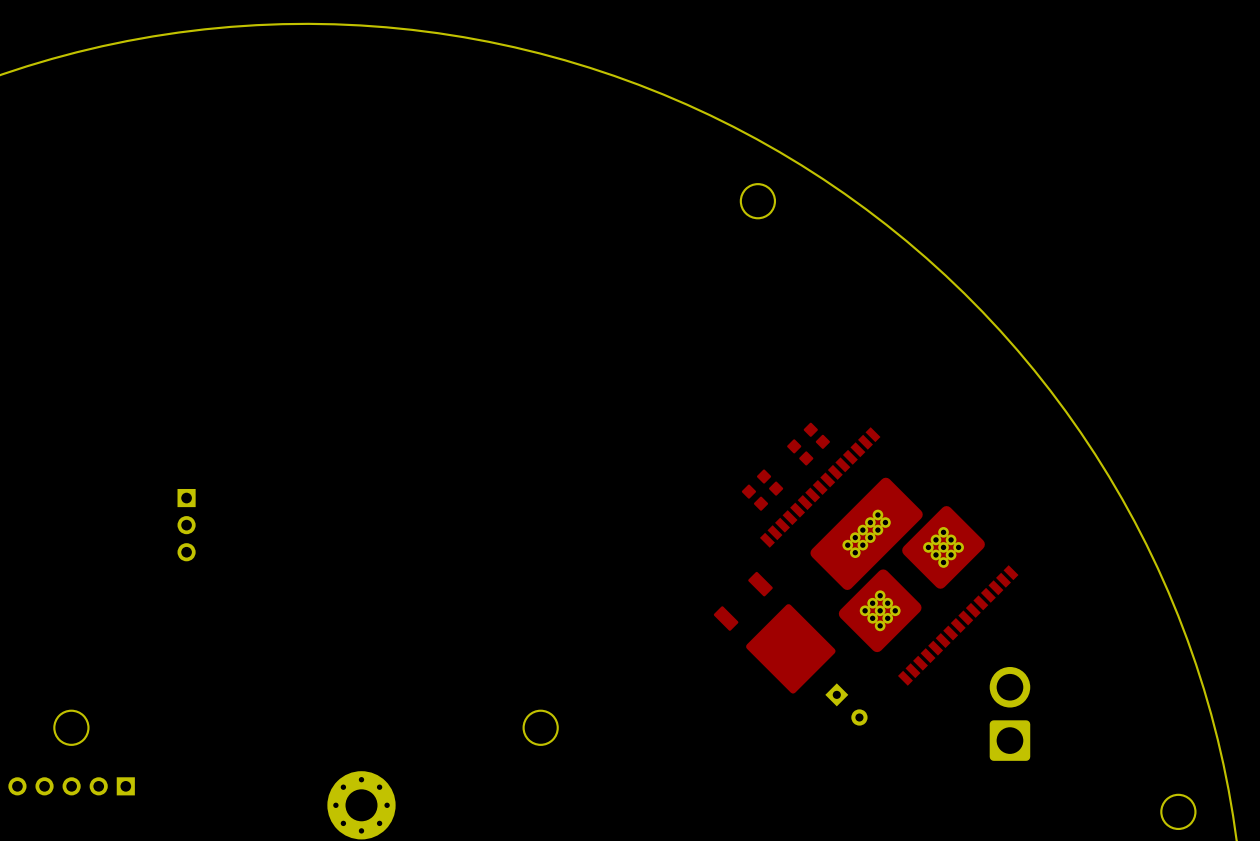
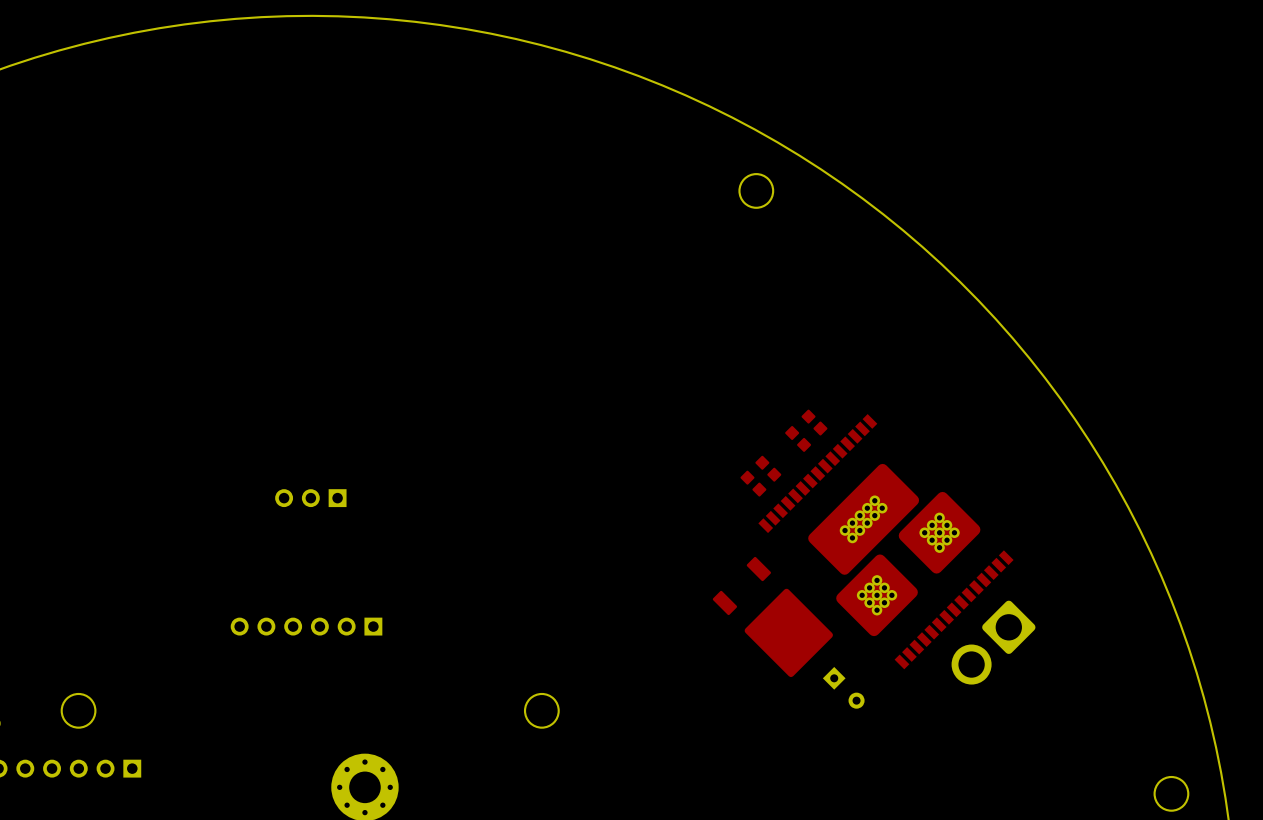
part rotation: 0° (186, 525) -> 90° clockwise (310, 498)
part position: (186, 525) -> (310, 498)
part: none -> (306, 626)
part: none -> (993, 642)
part: (1009, 713) -> none

